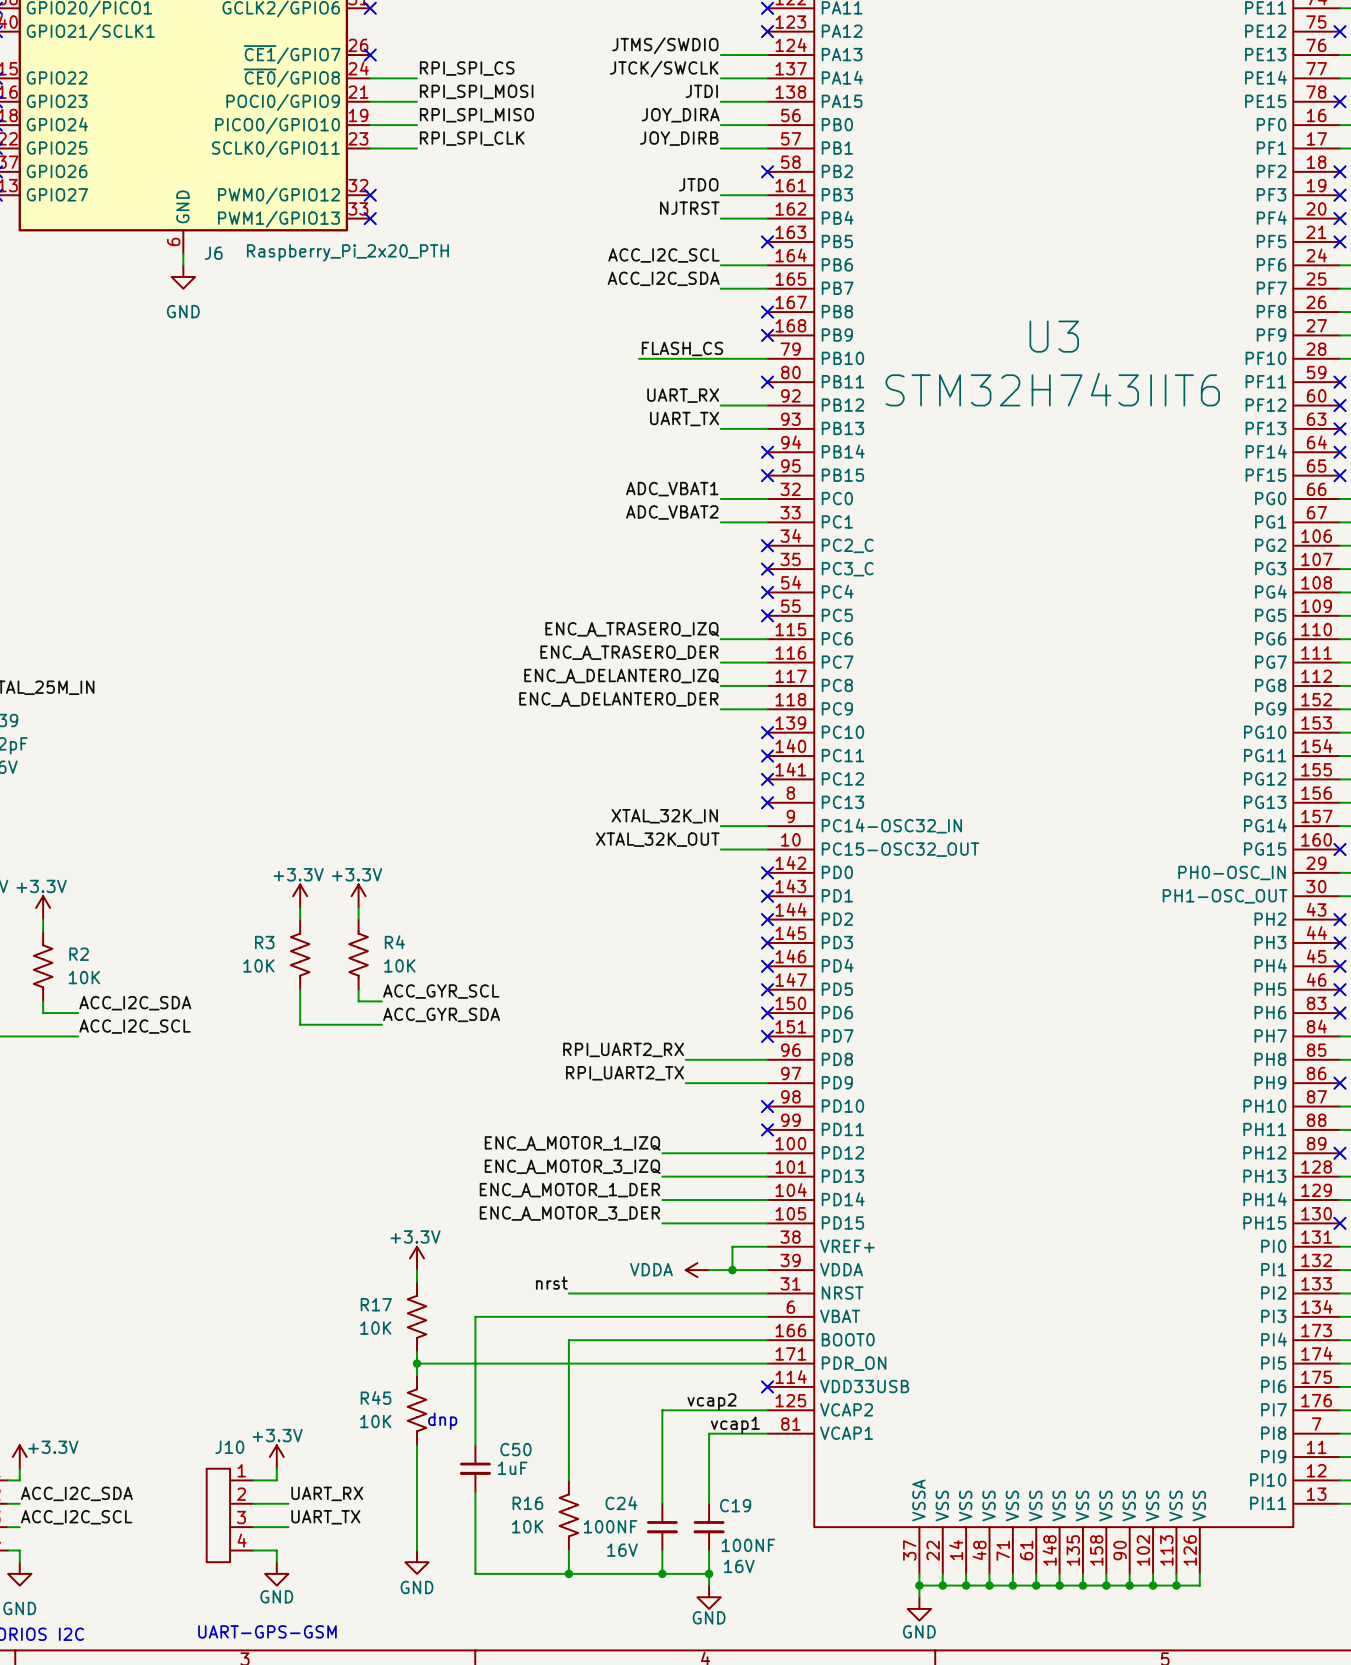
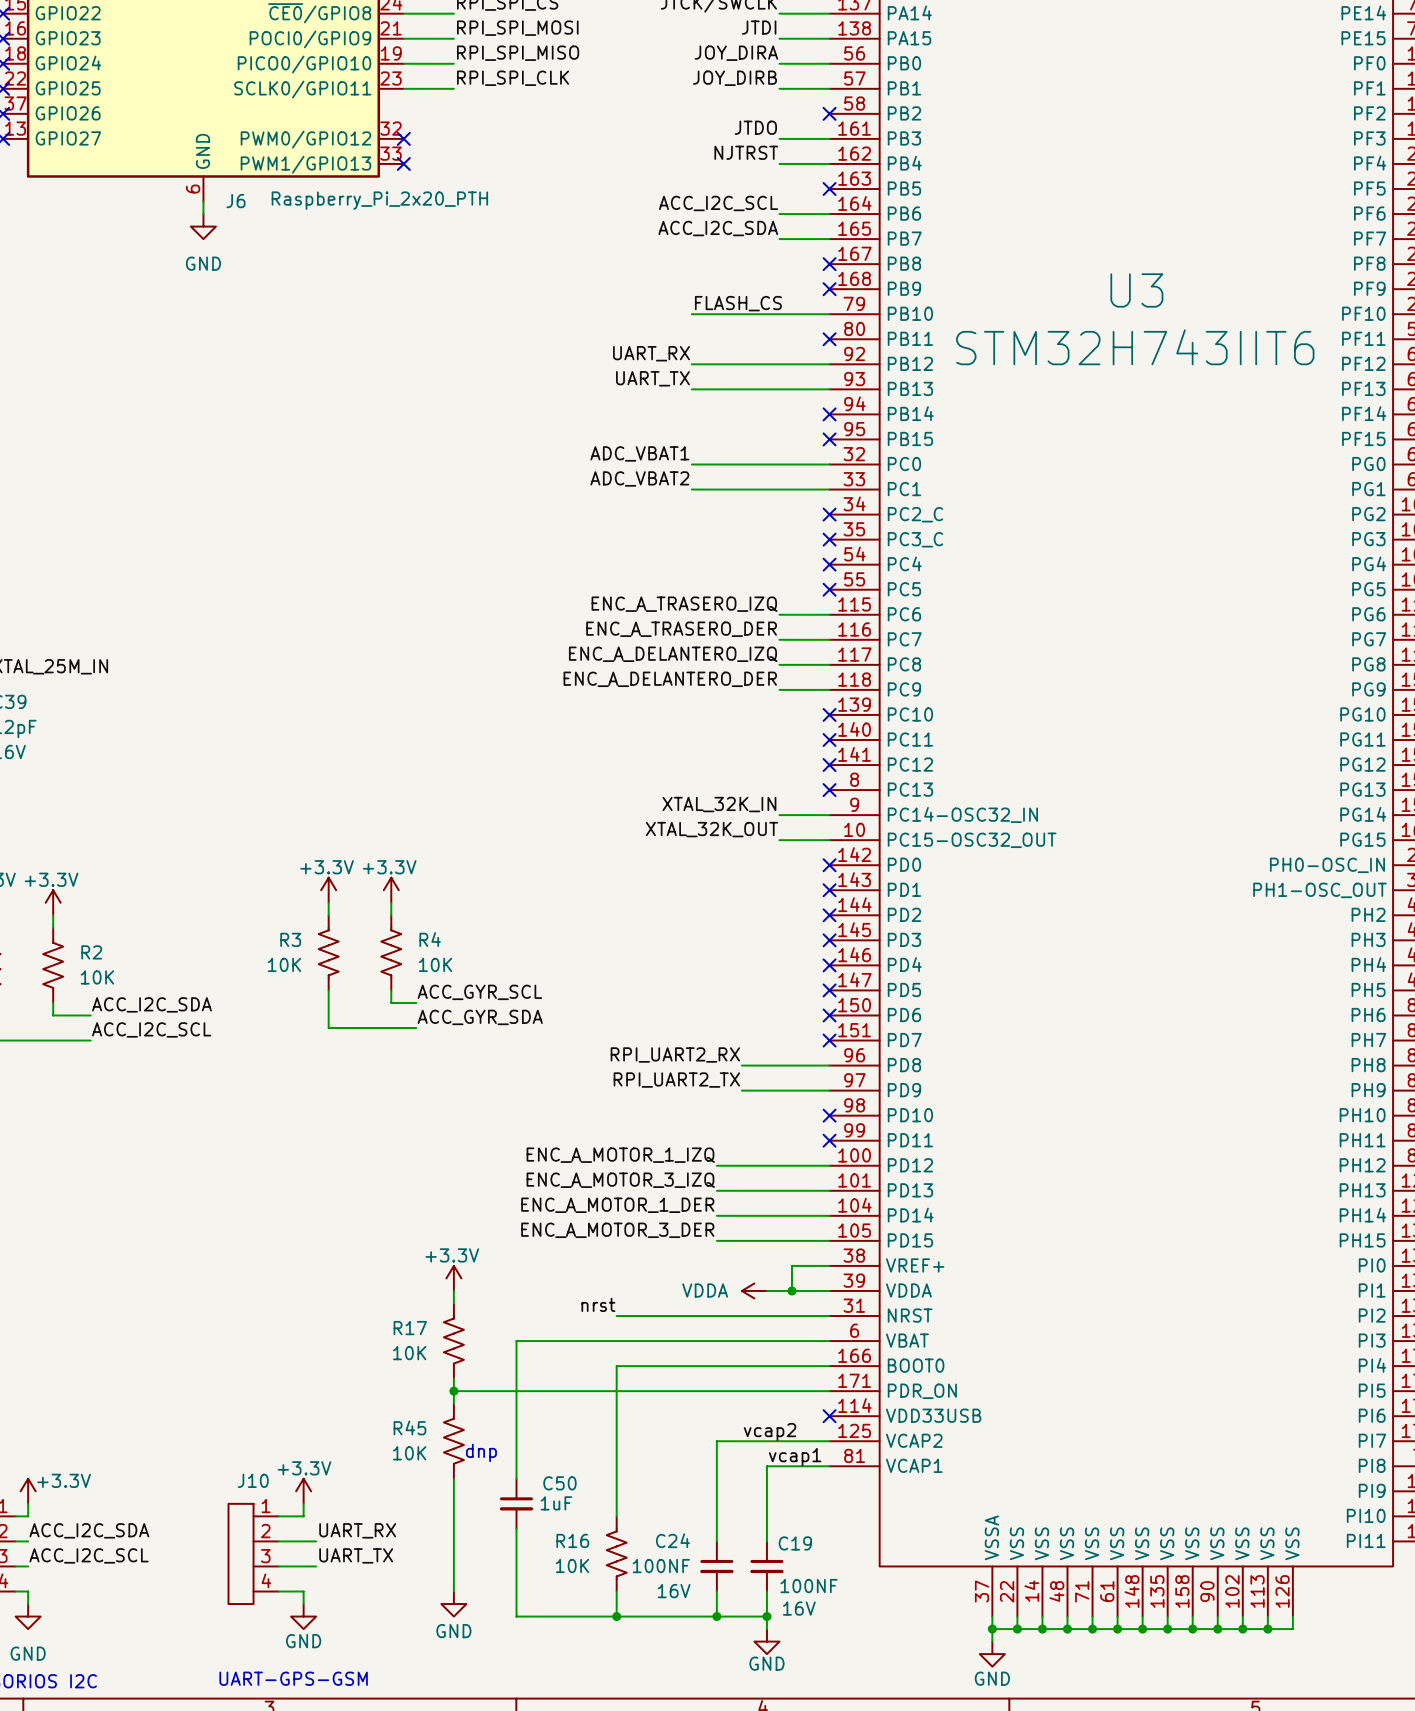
label position: UART_RX (683, 395) -> UART_RX (651, 353)
wire: none -> (691, 364) (779, 364)
label position: UART_TX (684, 419) -> UART_TX (652, 378)
wire: none -> (691, 389) (779, 389)
label position: ADC_VBAT1 (672, 489) -> ADC_VBAT1 (639, 453)
wire: none -> (691, 464) (779, 464)
label position: ADC_VBAT2 (672, 512) -> ADC_VBAT2 (639, 478)
wire: none -> (691, 489) (779, 489)

